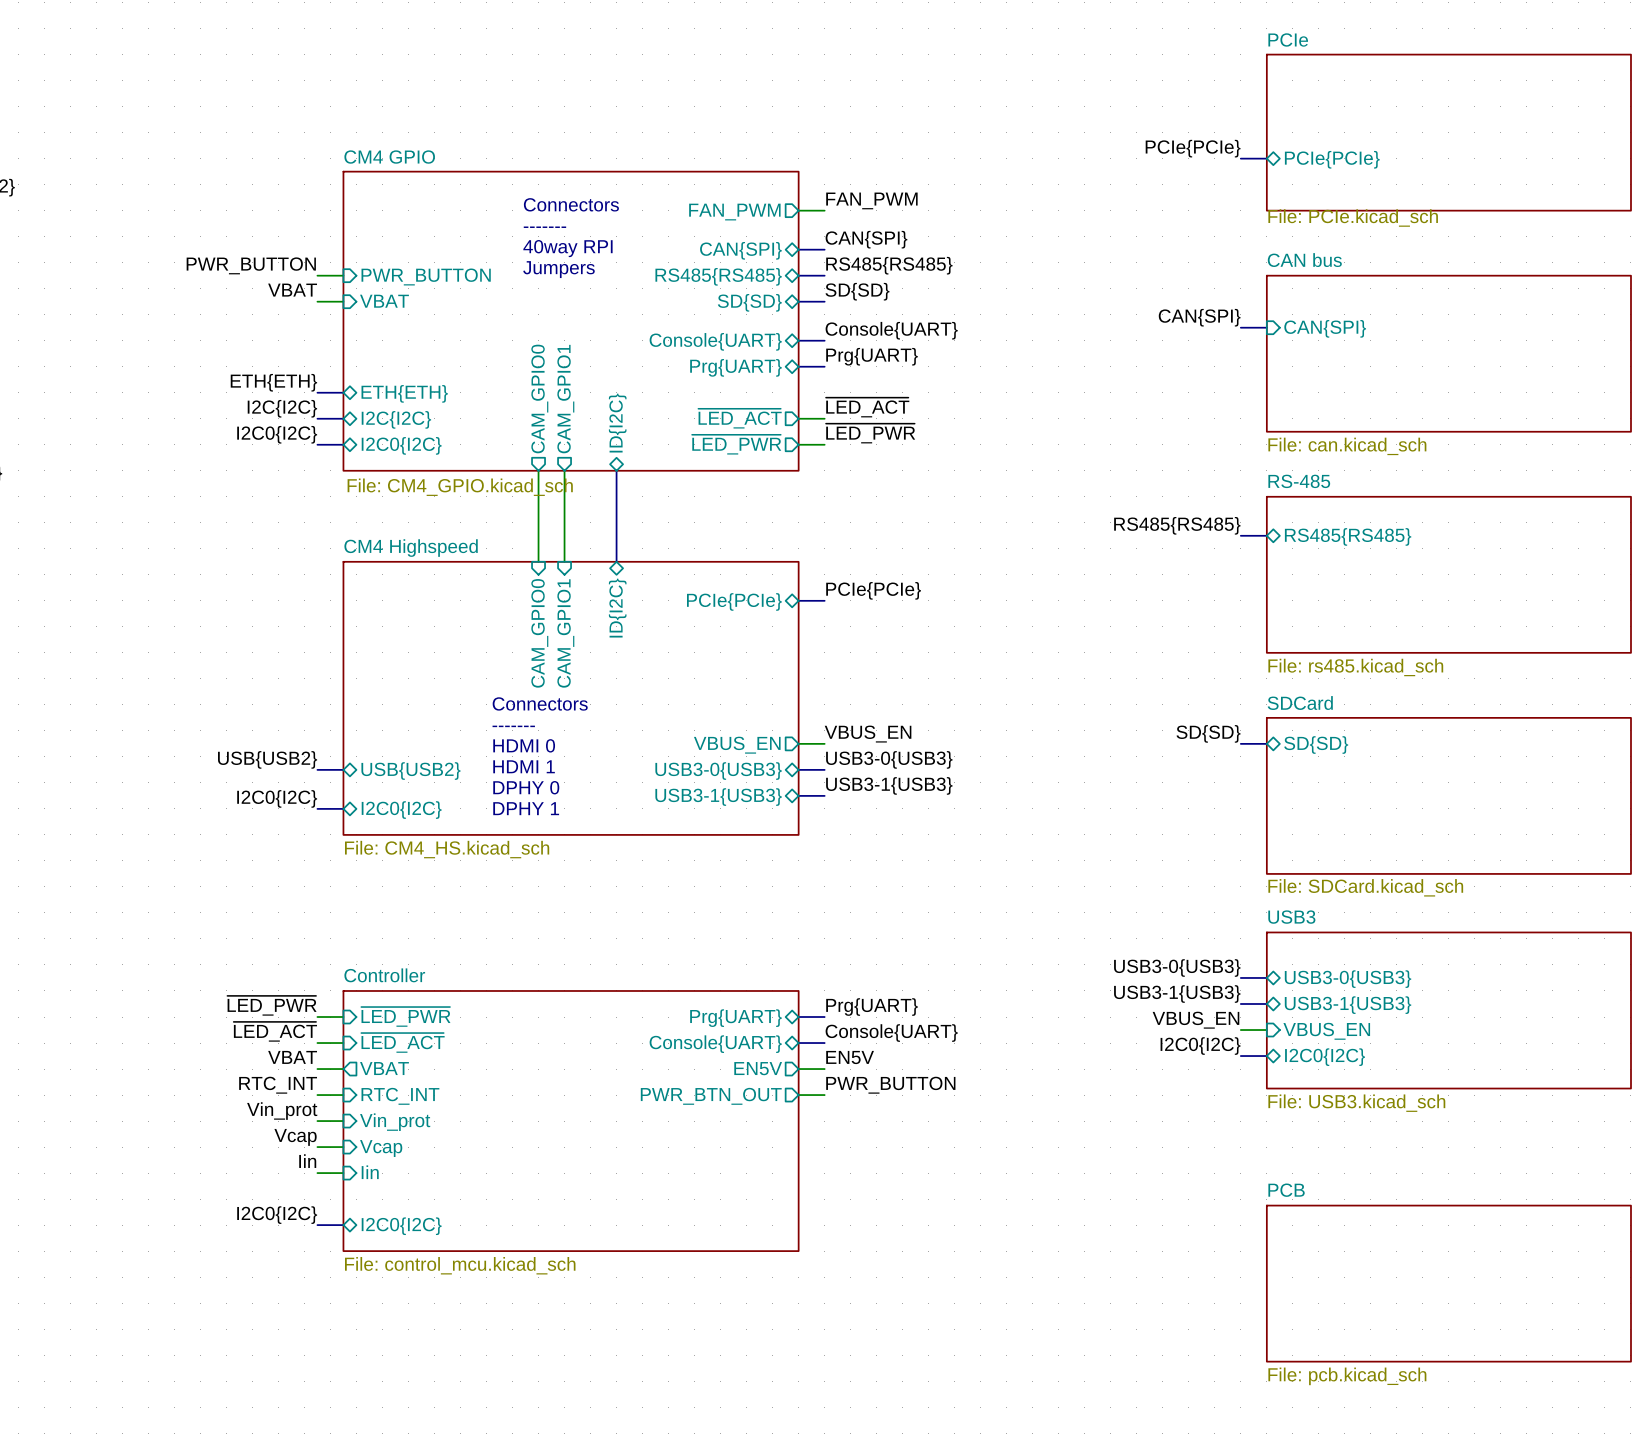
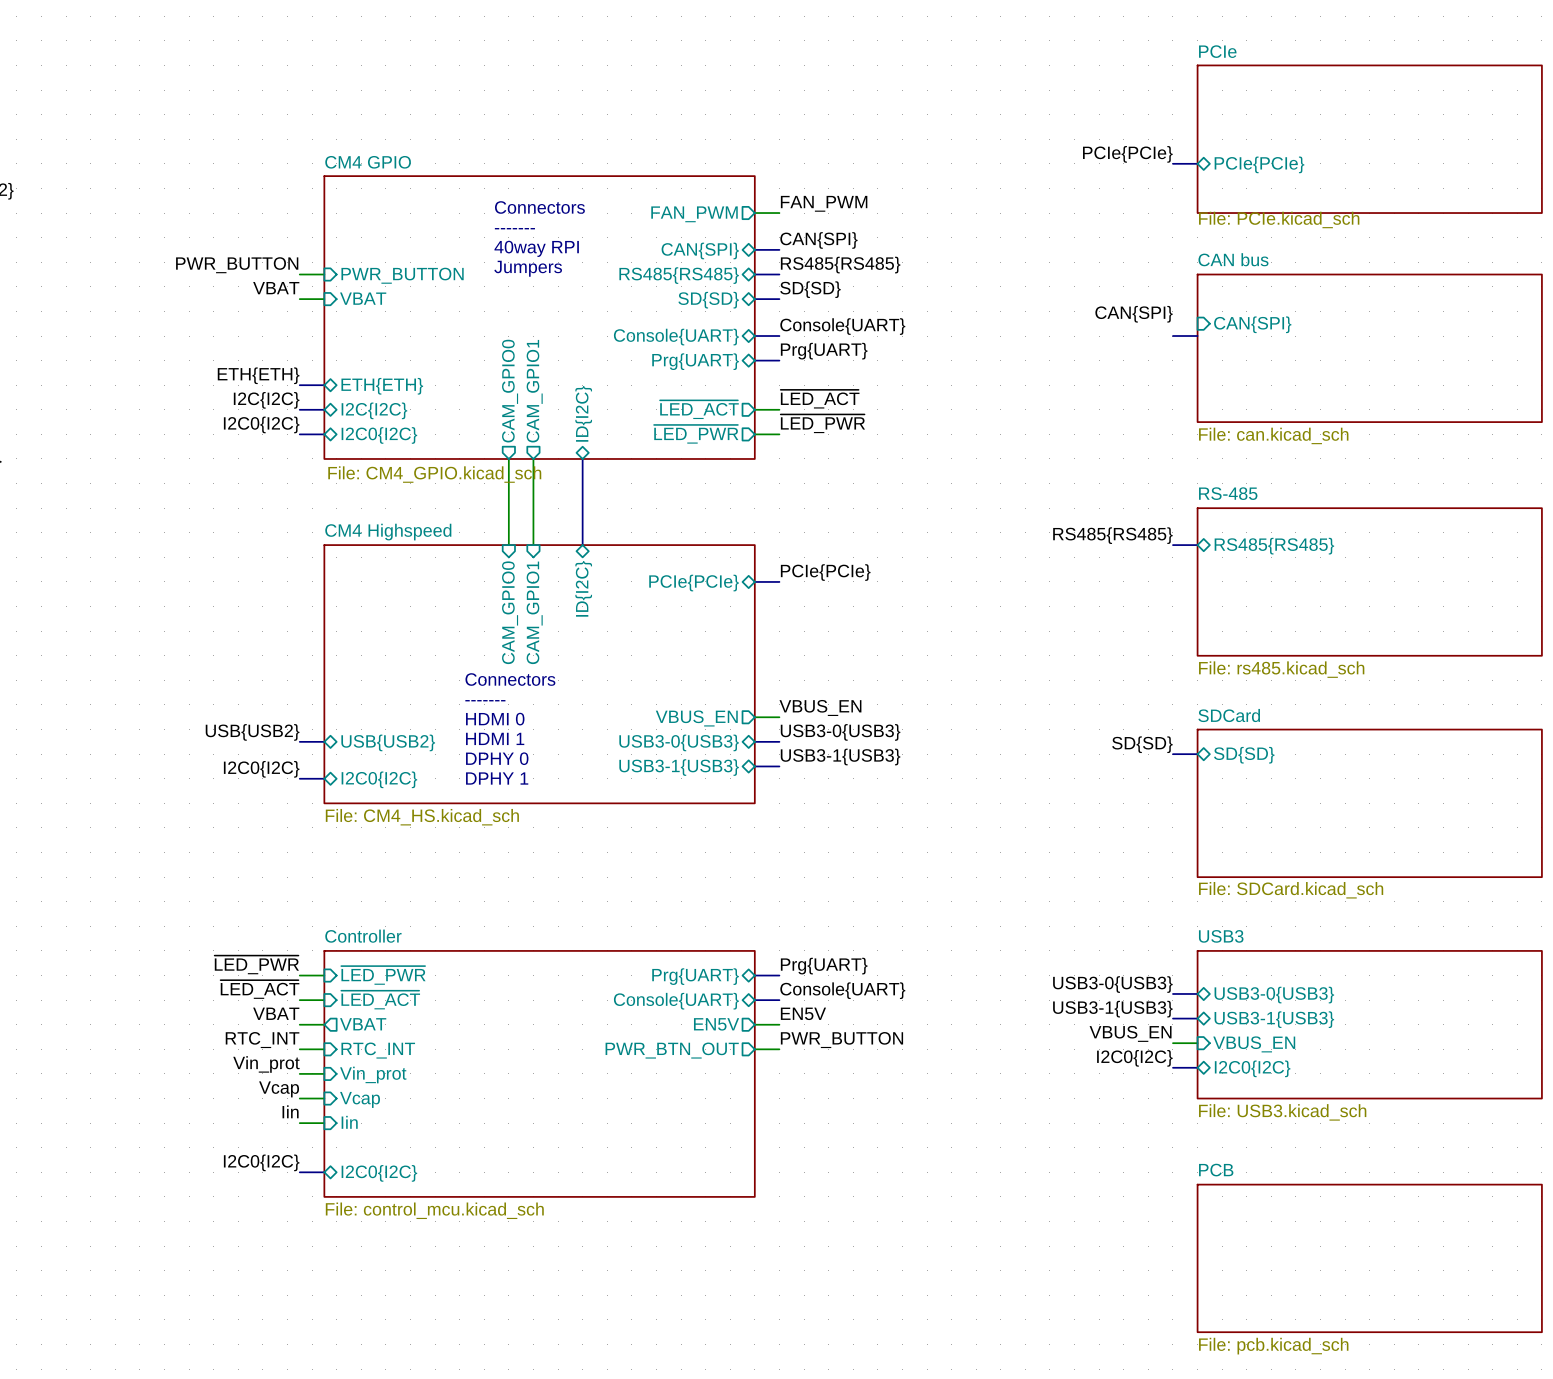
bus: (1240, 327) (1266, 327) -> (1172, 545) (1197, 545)
label position: RS485{RS485} (1177, 525) -> RS485{RS485} (1112, 535)
bus: (1240, 535) (1266, 535) -> (1172, 336) (1197, 336)
sheet pin position: RS485{RS485} (1348, 536) -> RS485{RS485} (1274, 546)
sheet RS-485 position: (1448, 574) -> (1369, 581)
label position: SD{SD} (1208, 733) -> SD{SD} (1142, 744)
bus: (1240, 743) (1266, 743) -> (1172, 754) (1197, 754)
sheet pin position: SD{SD} (1316, 745) -> SD{SD} (1244, 755)
sheet SDCard position: (1448, 795) -> (1369, 803)
label position: USB3-0{USB3} (1177, 967) -> USB3-0{USB3} (1112, 984)
bus: (1240, 977) (1266, 977) -> (1172, 993) (1197, 993)
sheet pin position: USB3-0{USB3} (1348, 979) -> USB3-0{USB3} (1274, 995)
label position: USB3-1{USB3} (1177, 994) -> USB3-1{USB3} (1112, 1009)
bus: (1240, 1003) (1266, 1003) -> (1172, 1018) (1197, 1018)
sheet pin position: USB3-1{USB3} (1348, 1005) -> USB3-1{USB3} (1274, 1019)
sheet USB3 position: (1448, 1010) -> (1369, 1024)
label position: VBUS_EN (1195, 1020) -> VBUS_EN (1130, 1033)
wire: (1240, 1030) (1266, 1030) -> (1172, 1043) (1197, 1043)
sheet pin position: VBUS_EN (1326, 1031) -> VBUS_EN (1254, 1044)
label position: I2C0{I2C} (1200, 1046) -> I2C0{I2C} (1134, 1058)
bus: (1240, 1056) (1266, 1056) -> (1172, 1067) (1197, 1067)
sheet pin position: I2C0{I2C} (1325, 1057) -> I2C0{I2C} (1252, 1068)
sheet PCB position: (1448, 1283) -> (1369, 1258)

